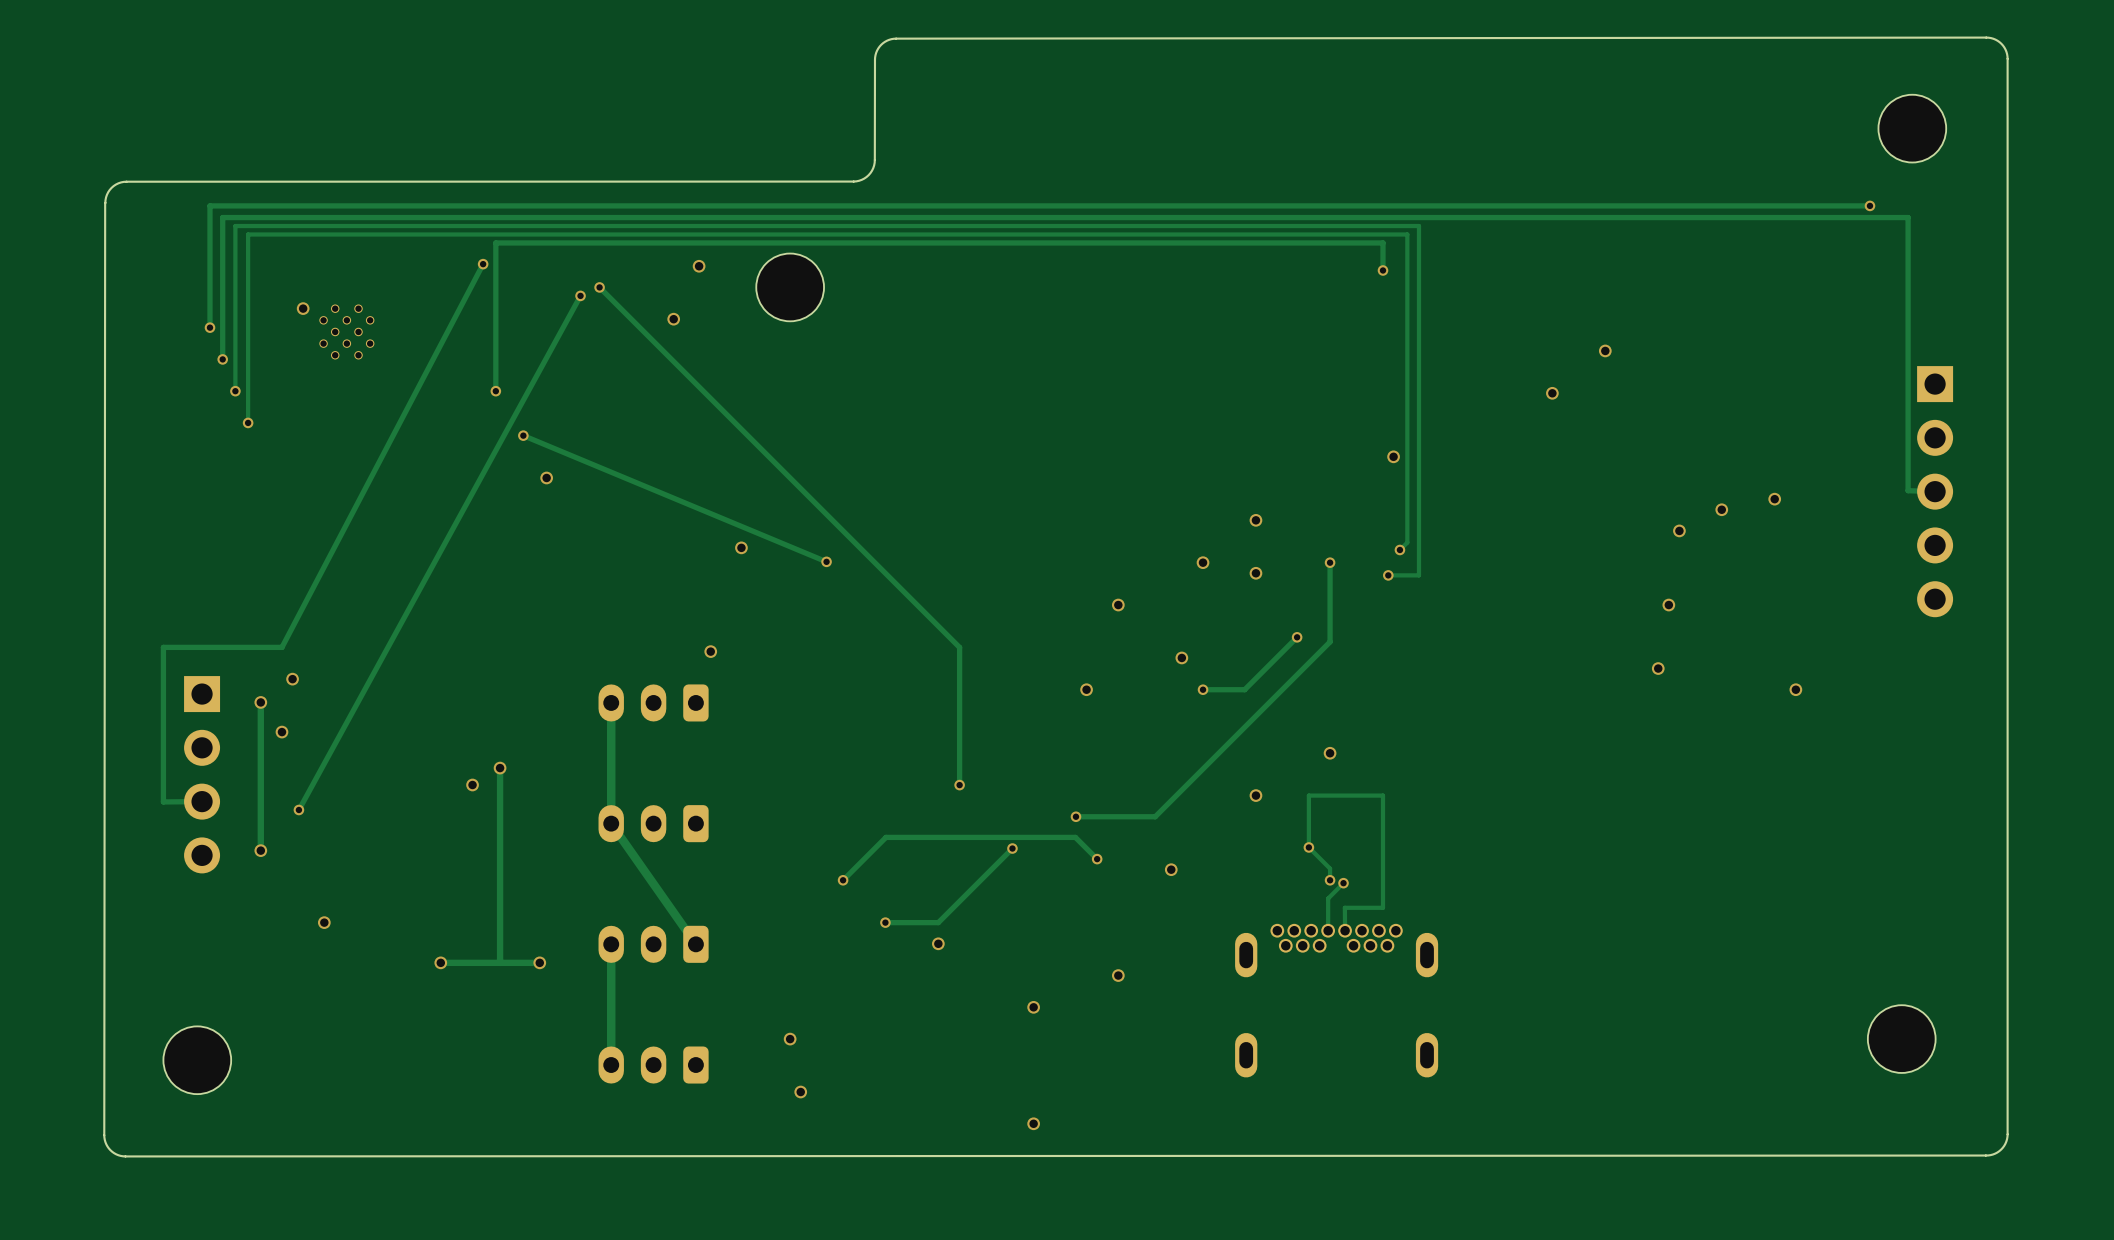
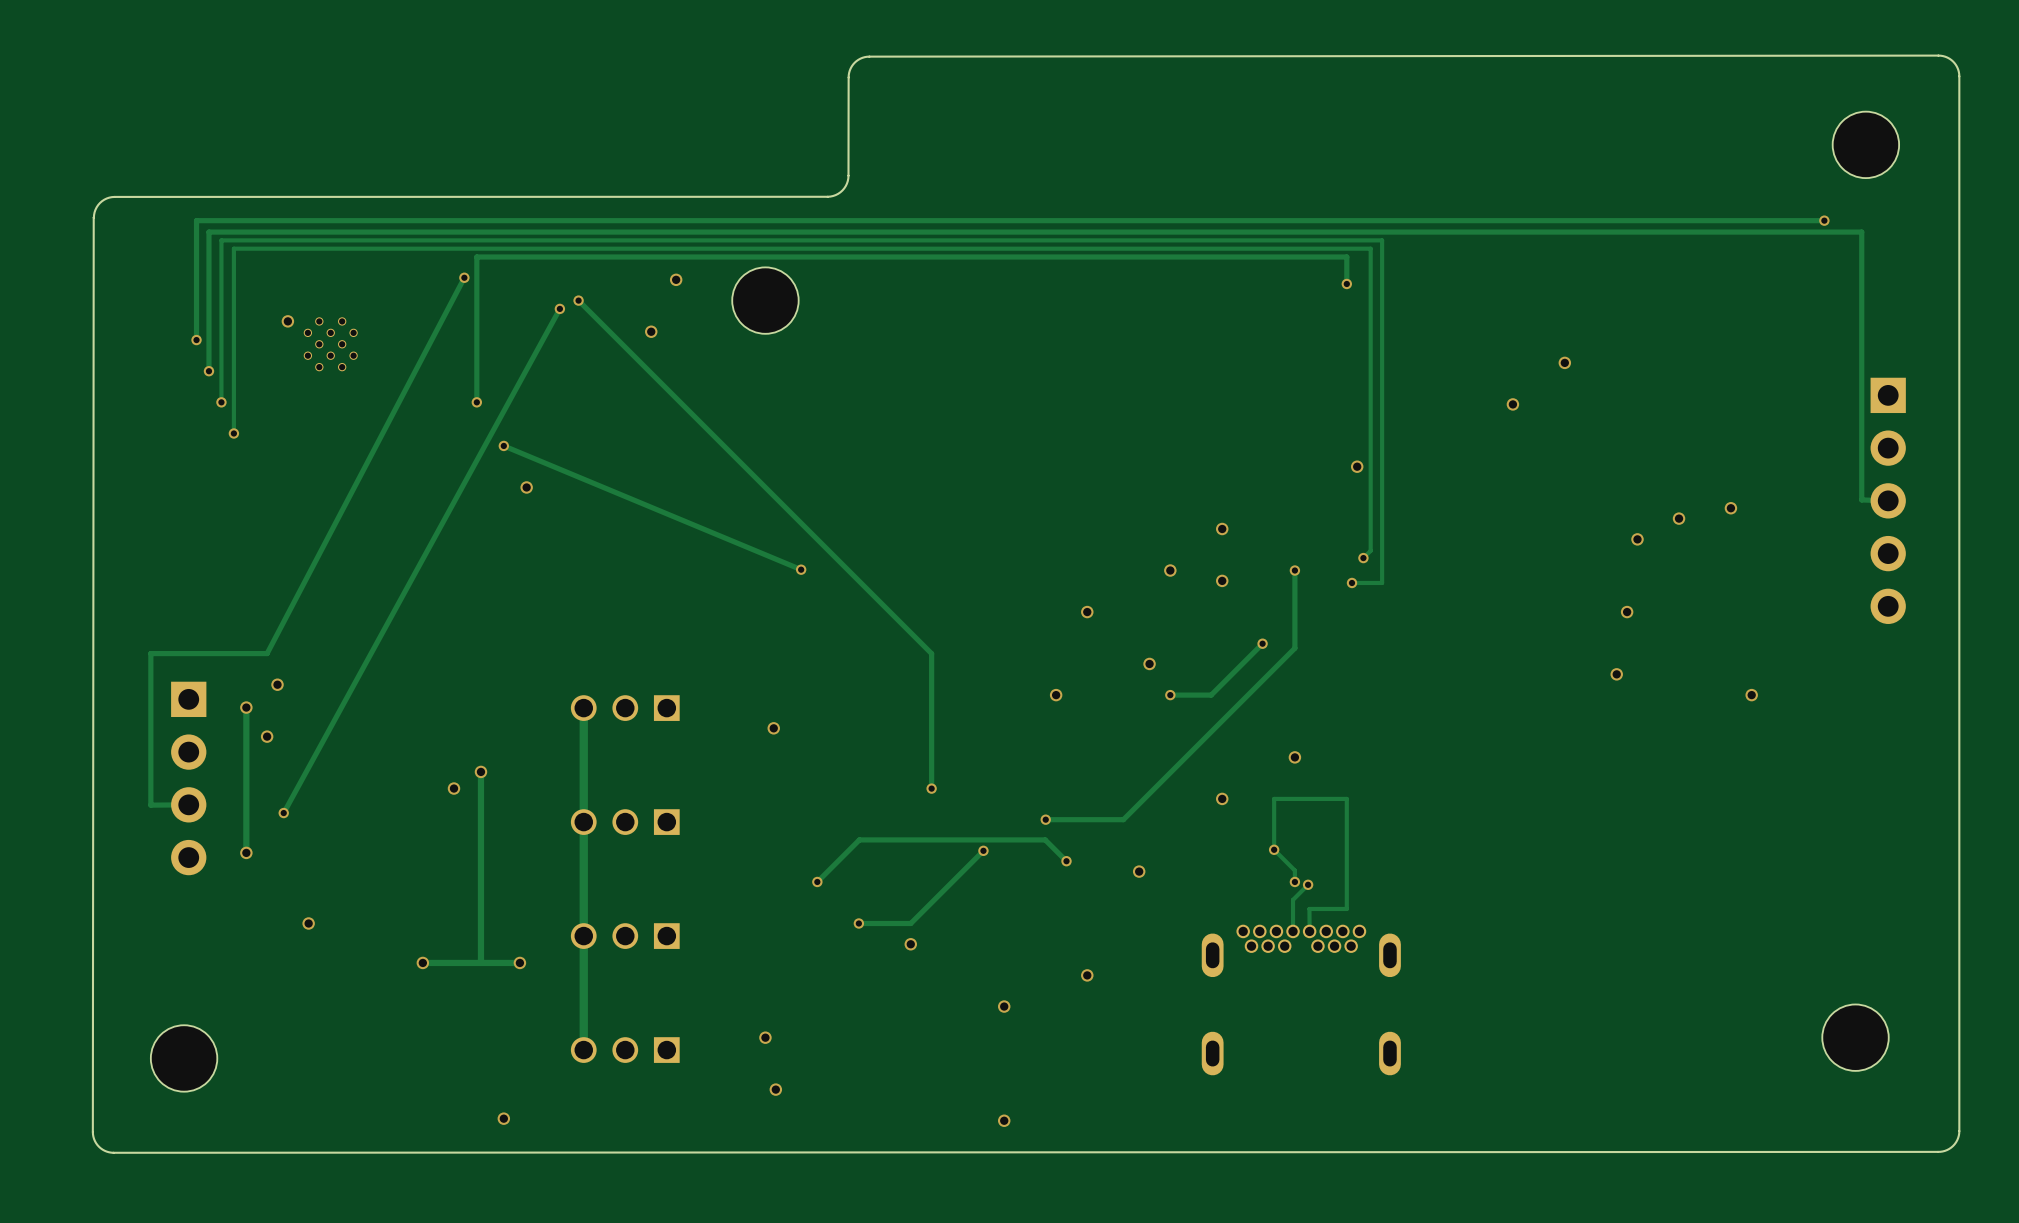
via: (741, 547) -> none
via: (710, 651) -> none
part footprint: [598, 684, 709, 722] -> [570, 695, 680, 721]
track: none -> (583, 708) (583, 1050)
track: (611, 702) (611, 823) (695, 944) -> none
via: none -> (773, 728)
part footprint: [598, 805, 709, 843] -> [570, 809, 680, 835]
part footprint: [598, 925, 709, 963] -> [570, 923, 680, 949]
track: (611, 944) (611, 1065) -> none
part footprint: [598, 1046, 709, 1084] -> [570, 1037, 680, 1063]
via: none -> (503, 1118)

